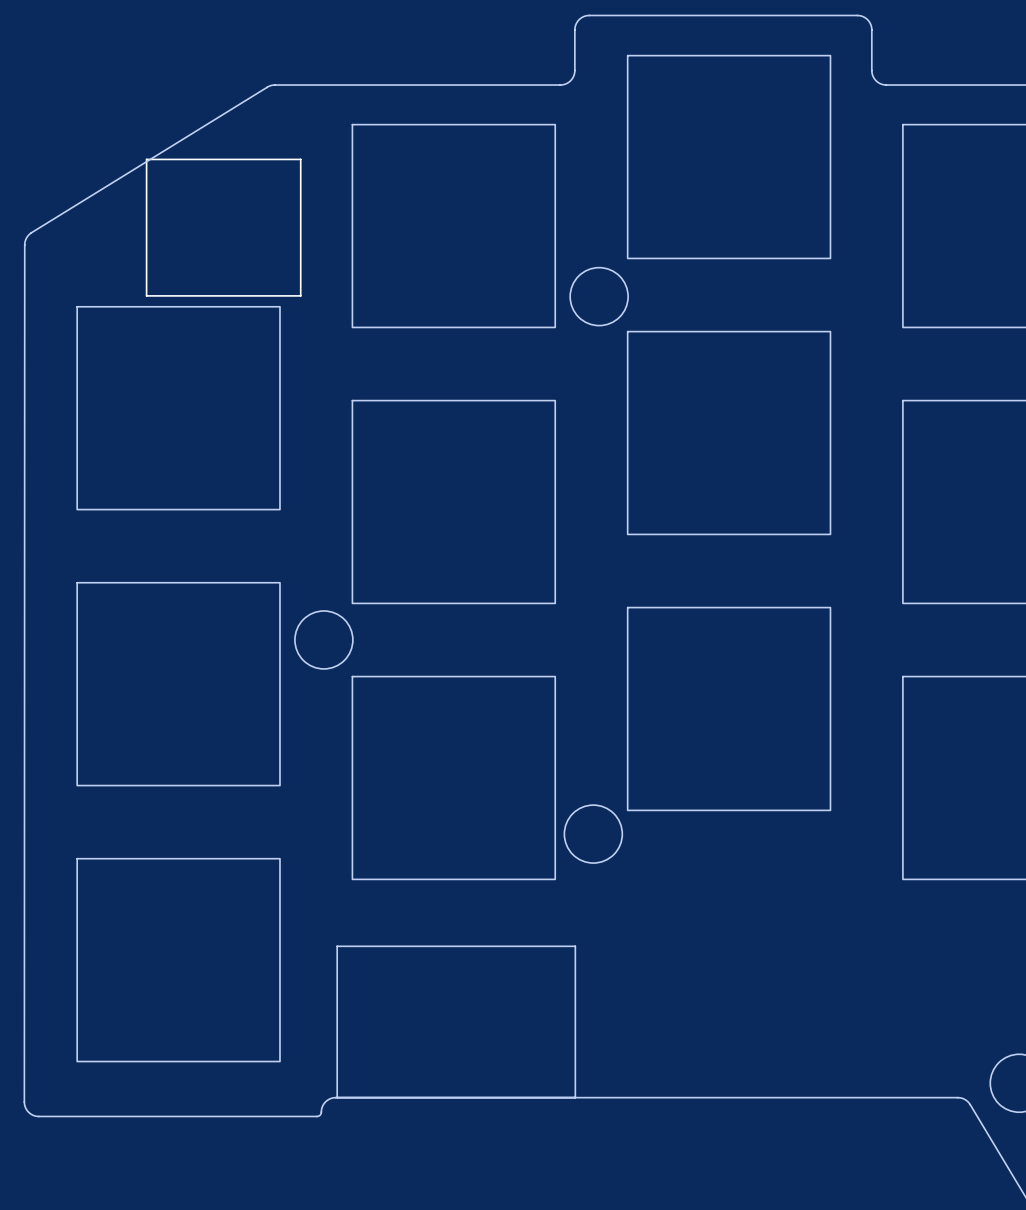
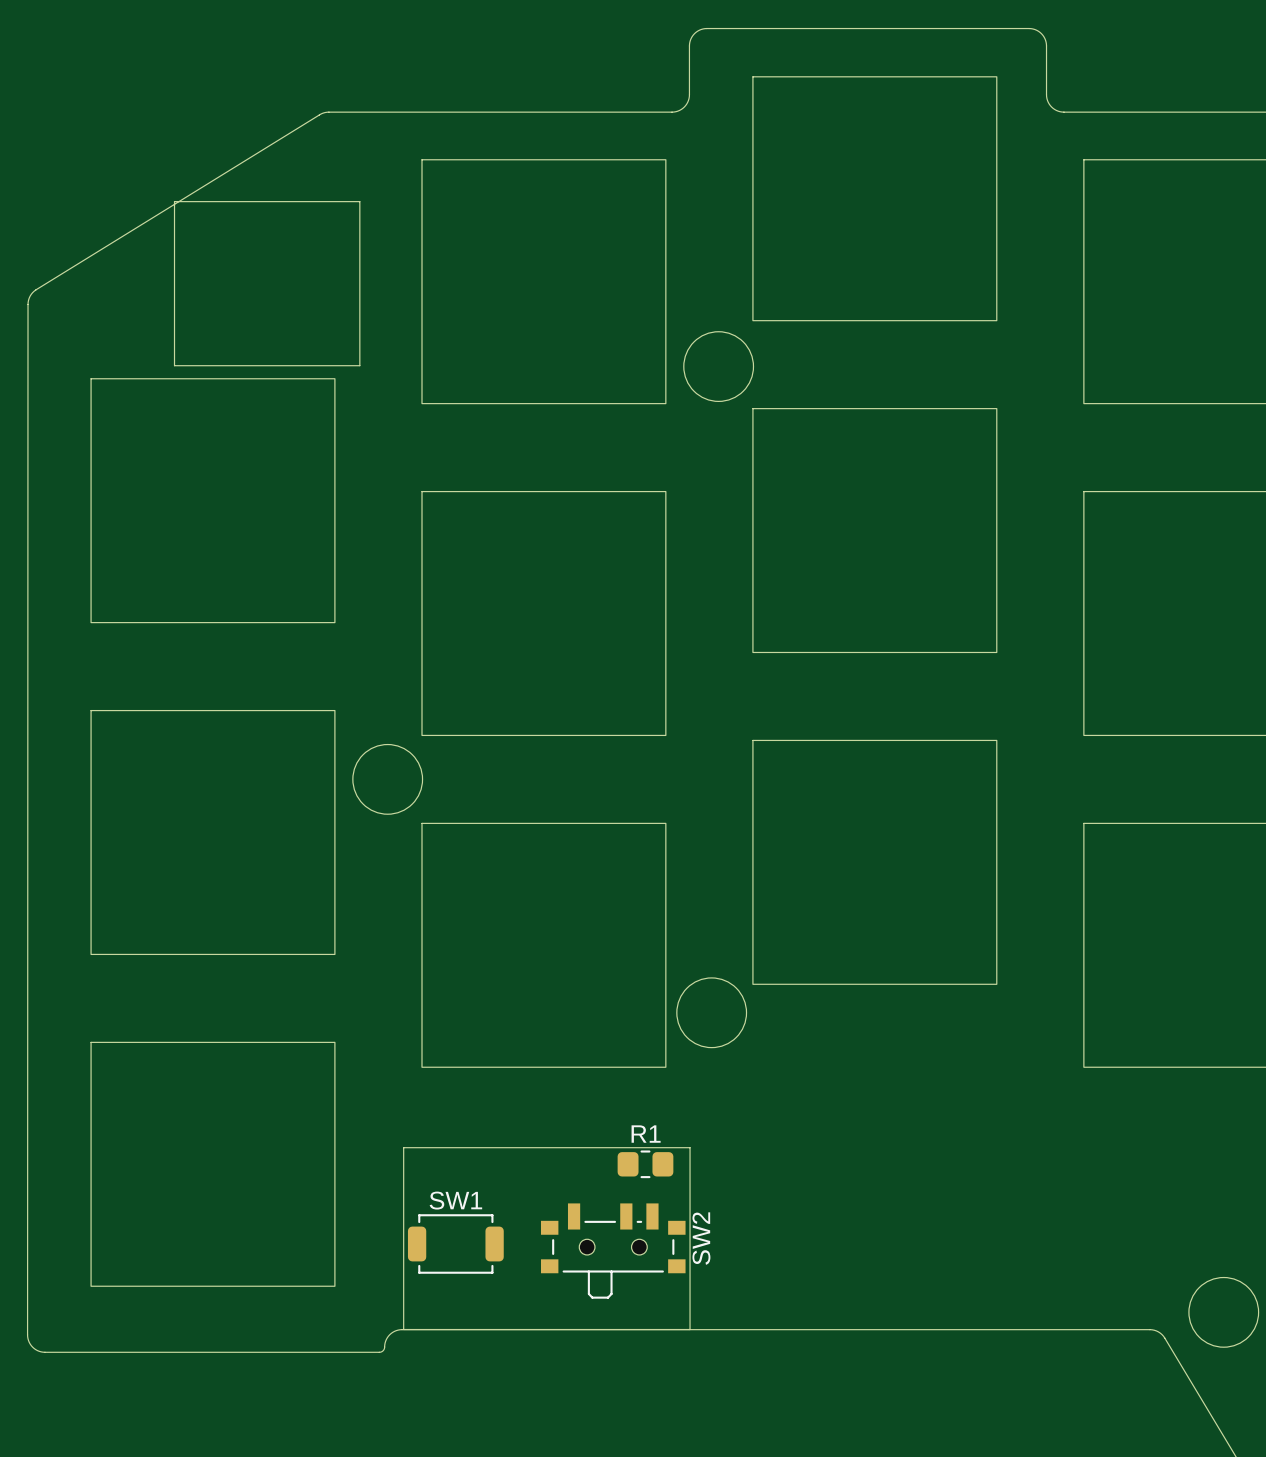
drawing shape: [146, 159, 302, 297] -> [174, 201, 361, 367]
R1: none -> (645, 1164)
SW1: none -> (455, 1243)
SW2: none -> (613, 1251)

